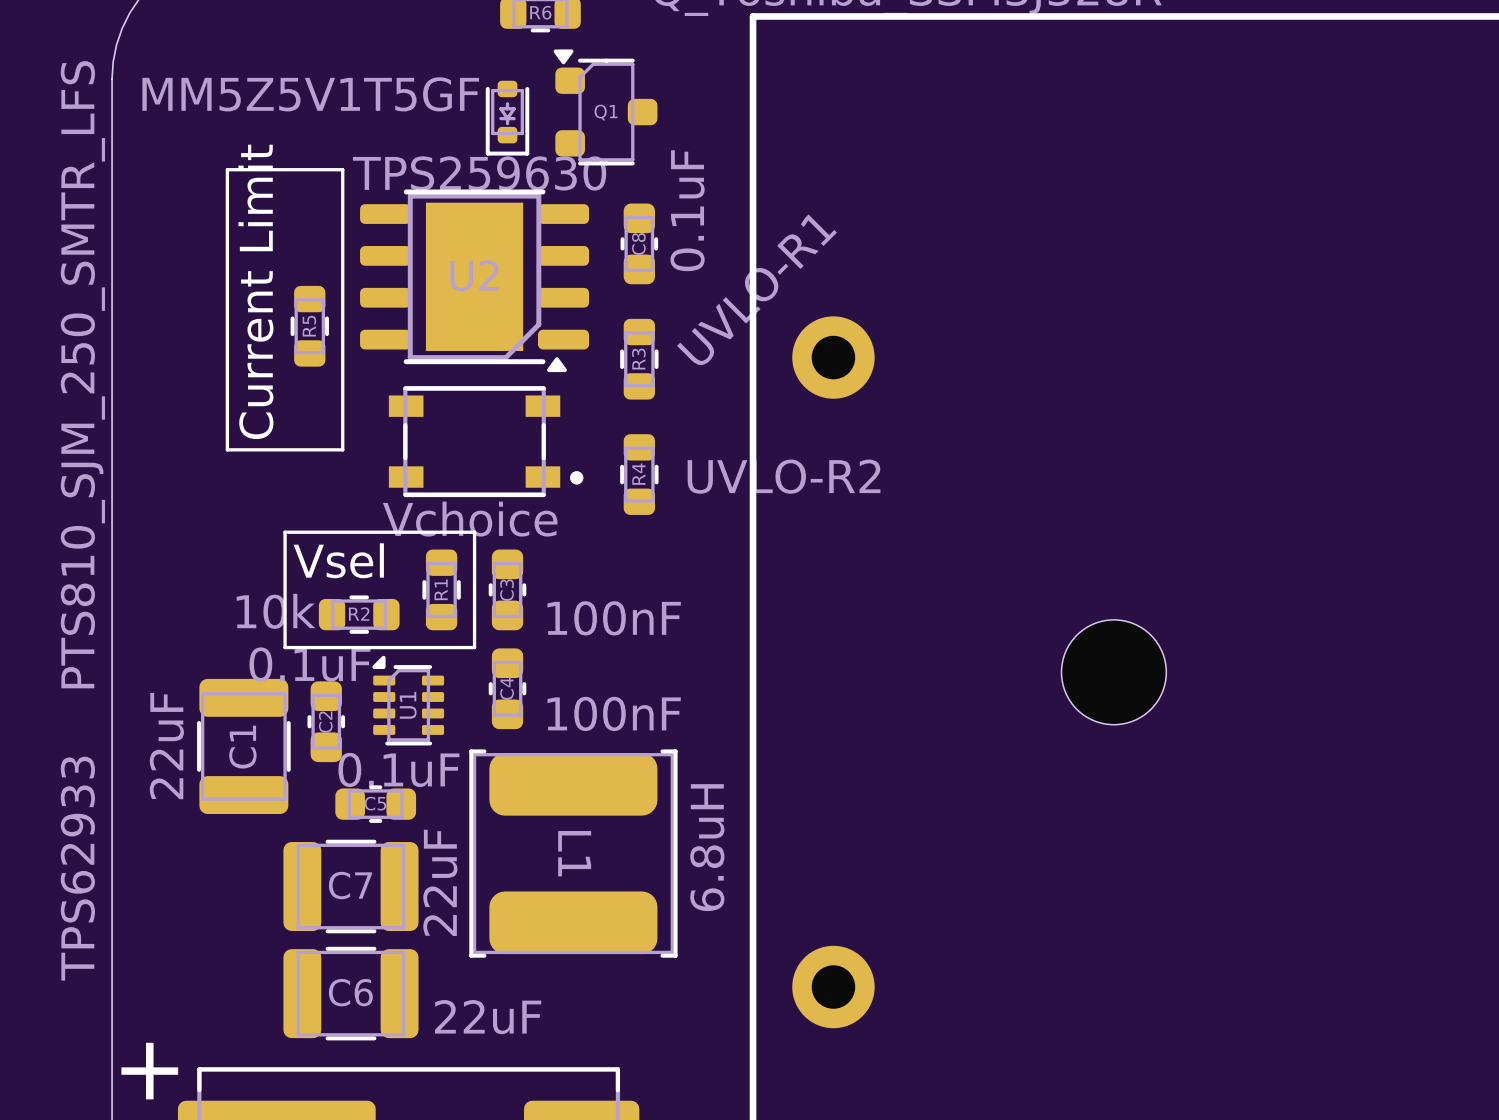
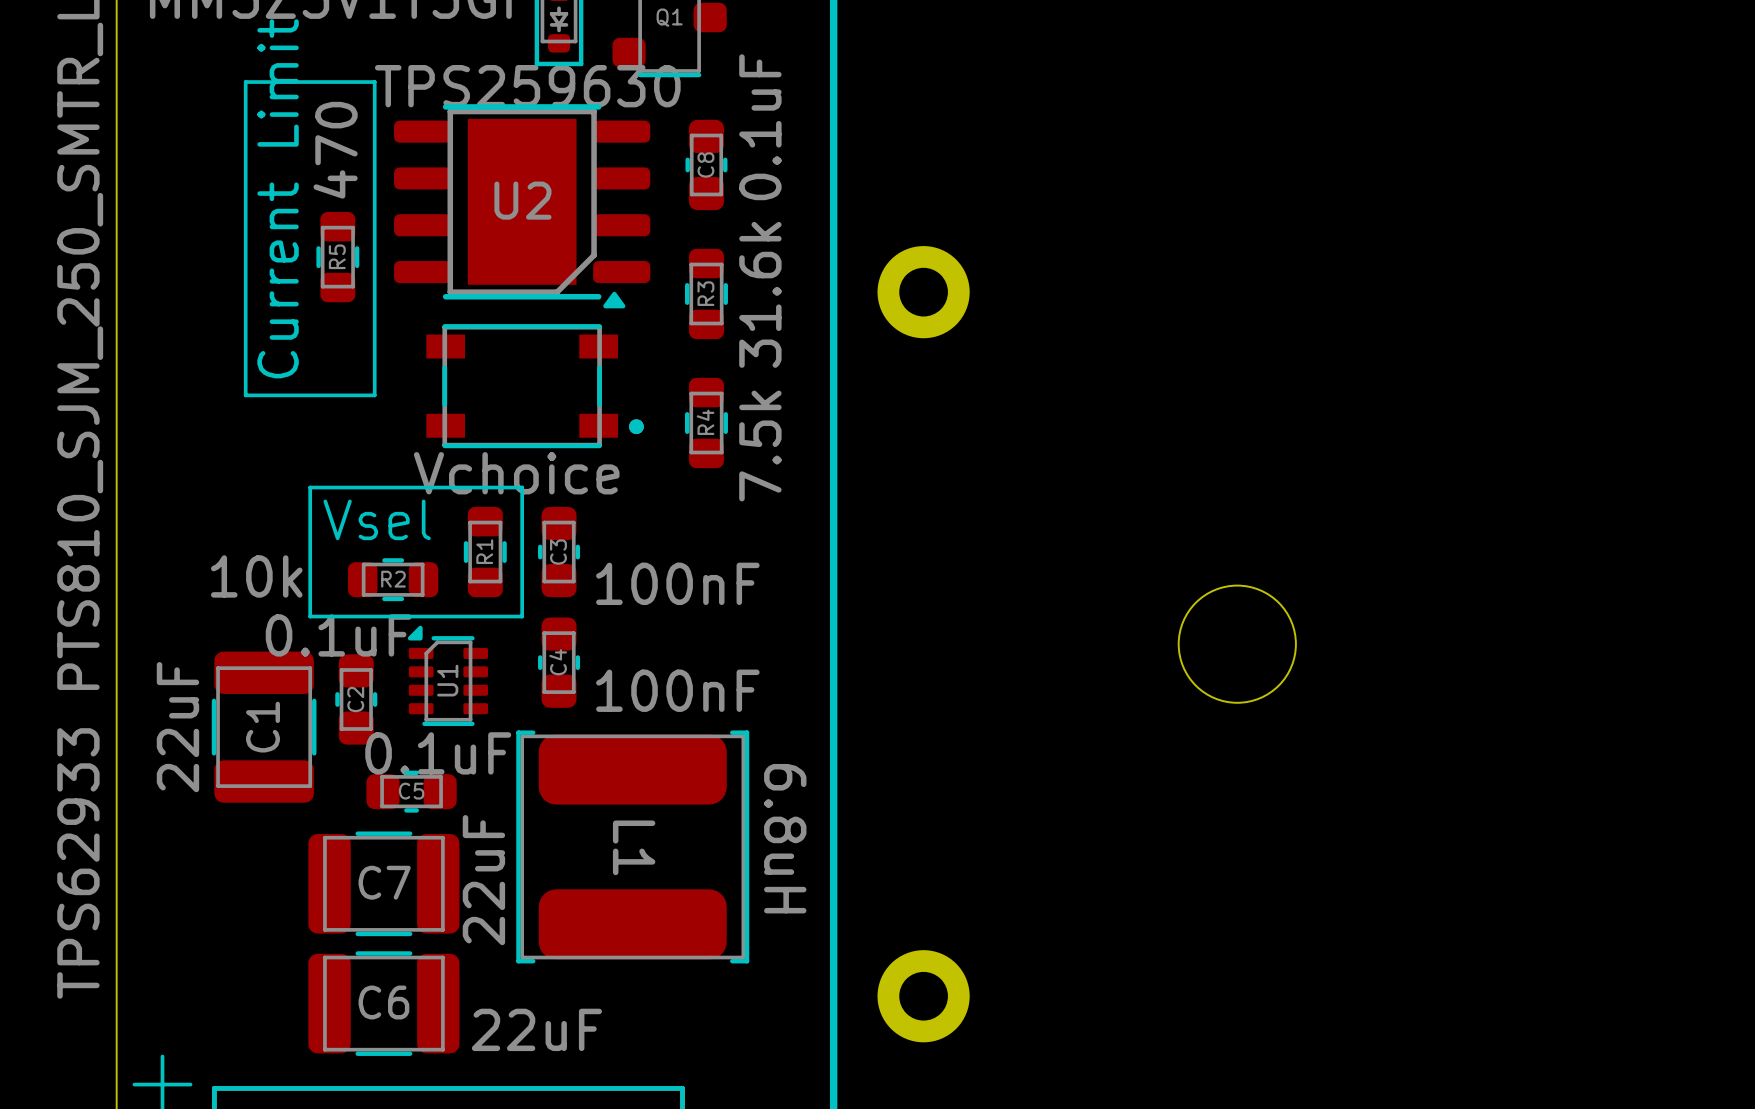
R5 value: none -> 470 (335, 150)
R3 value: UVLO-R1 (757, 289) -> 31.6k (760, 294)
R4 value: UVLO-R2 (784, 476) -> 7.5k (760, 446)
R2 value position: 10k (275, 611) -> 10k (256, 576)
L1 value rotation: 0° (707, 847) -> 180° (785, 838)

